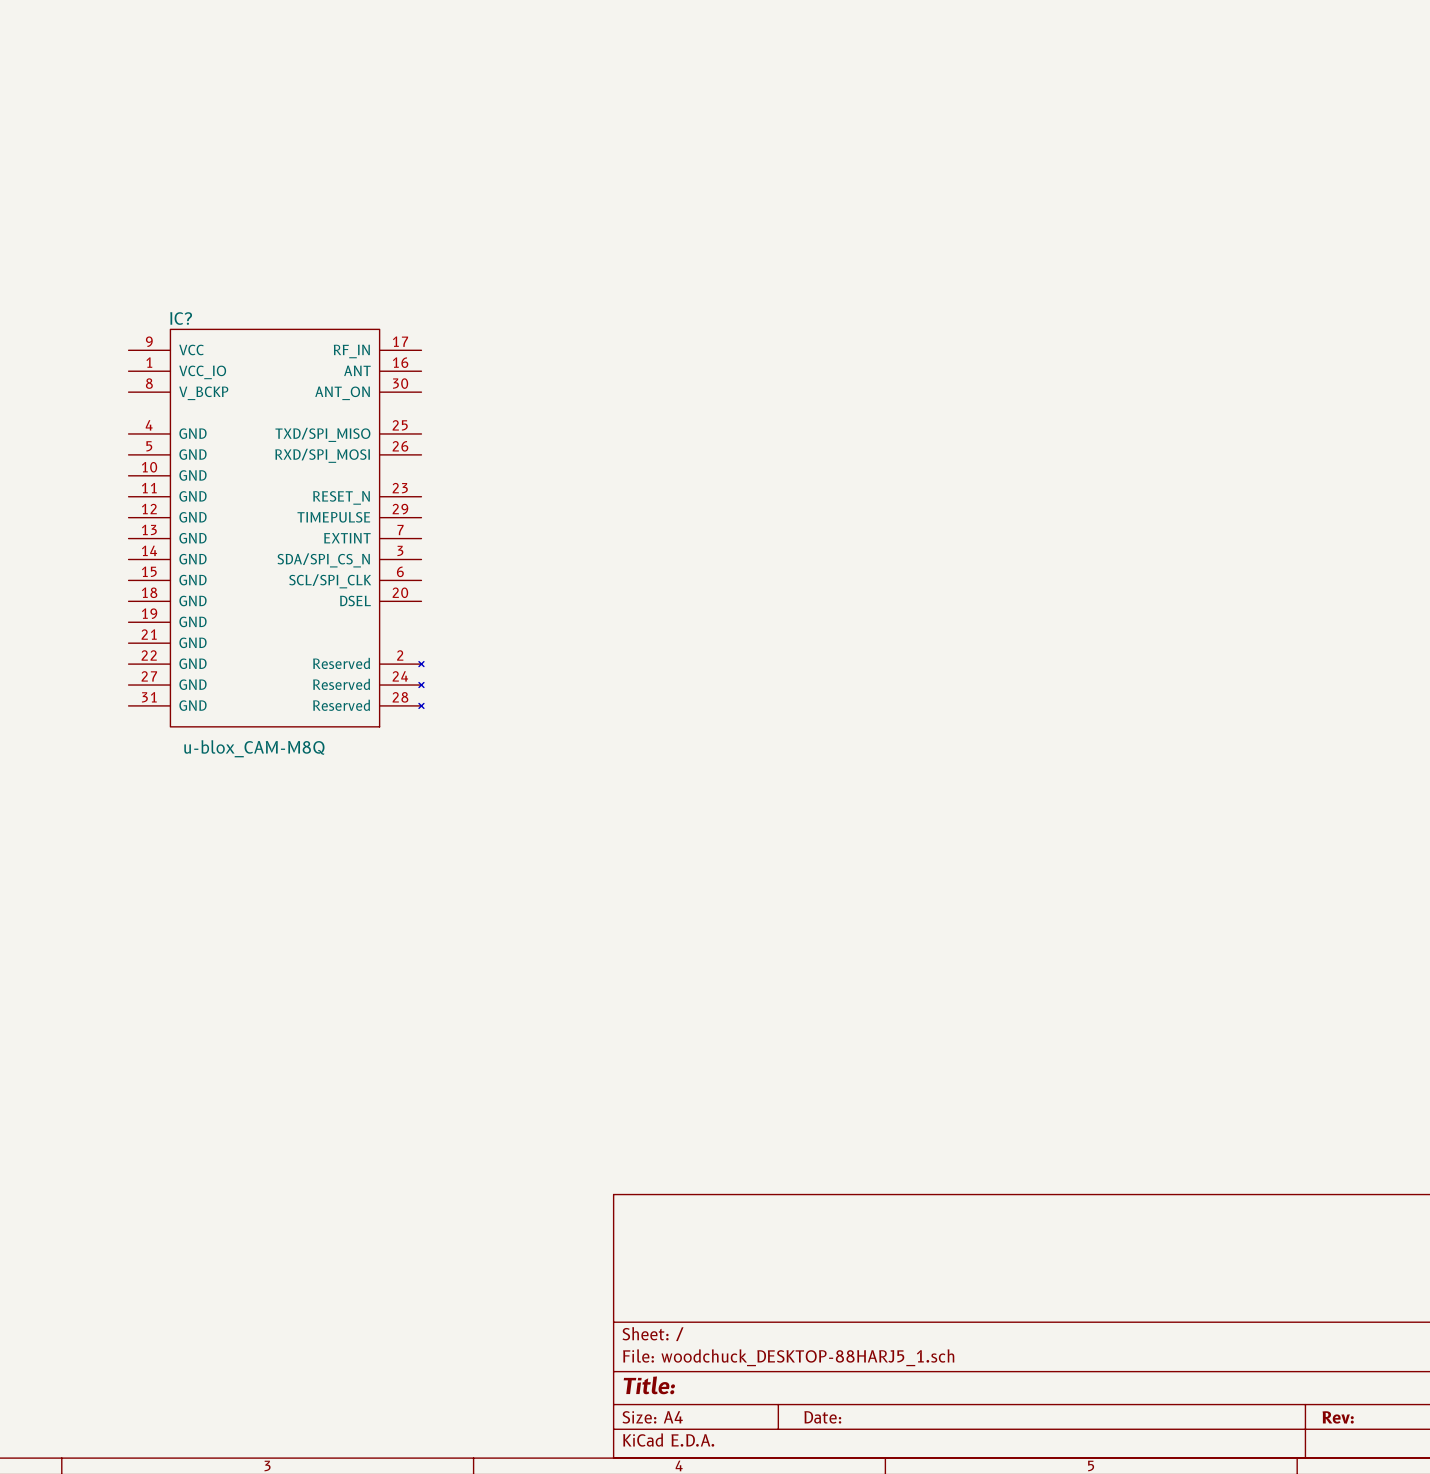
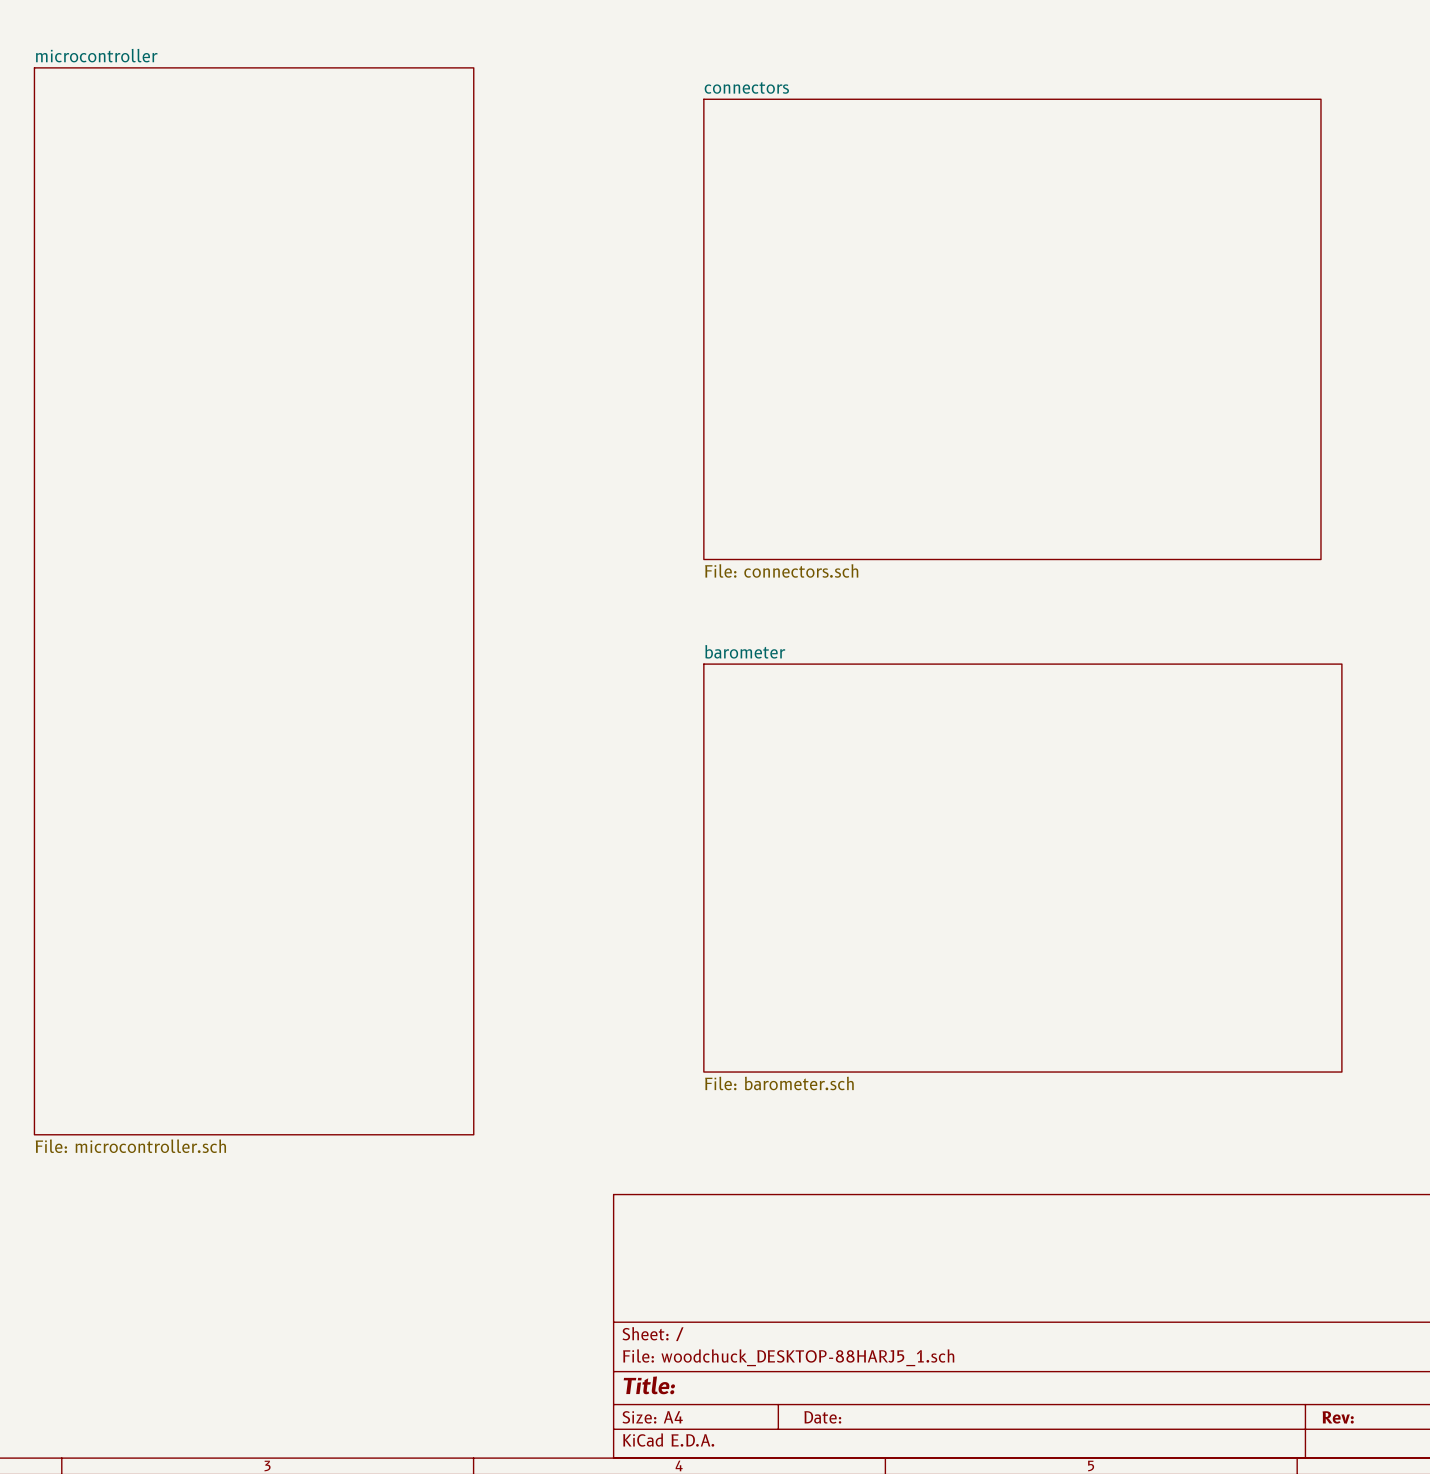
sheet connectors: none -> File: connectors.sch (1012, 329)
IC?: u-blox_CAM-M8Q (276, 528) -> none
sheet microcontroller: none -> File: microcontroller.sch (254, 601)
sheet barometer: none -> File: barometer.sch (1022, 868)

